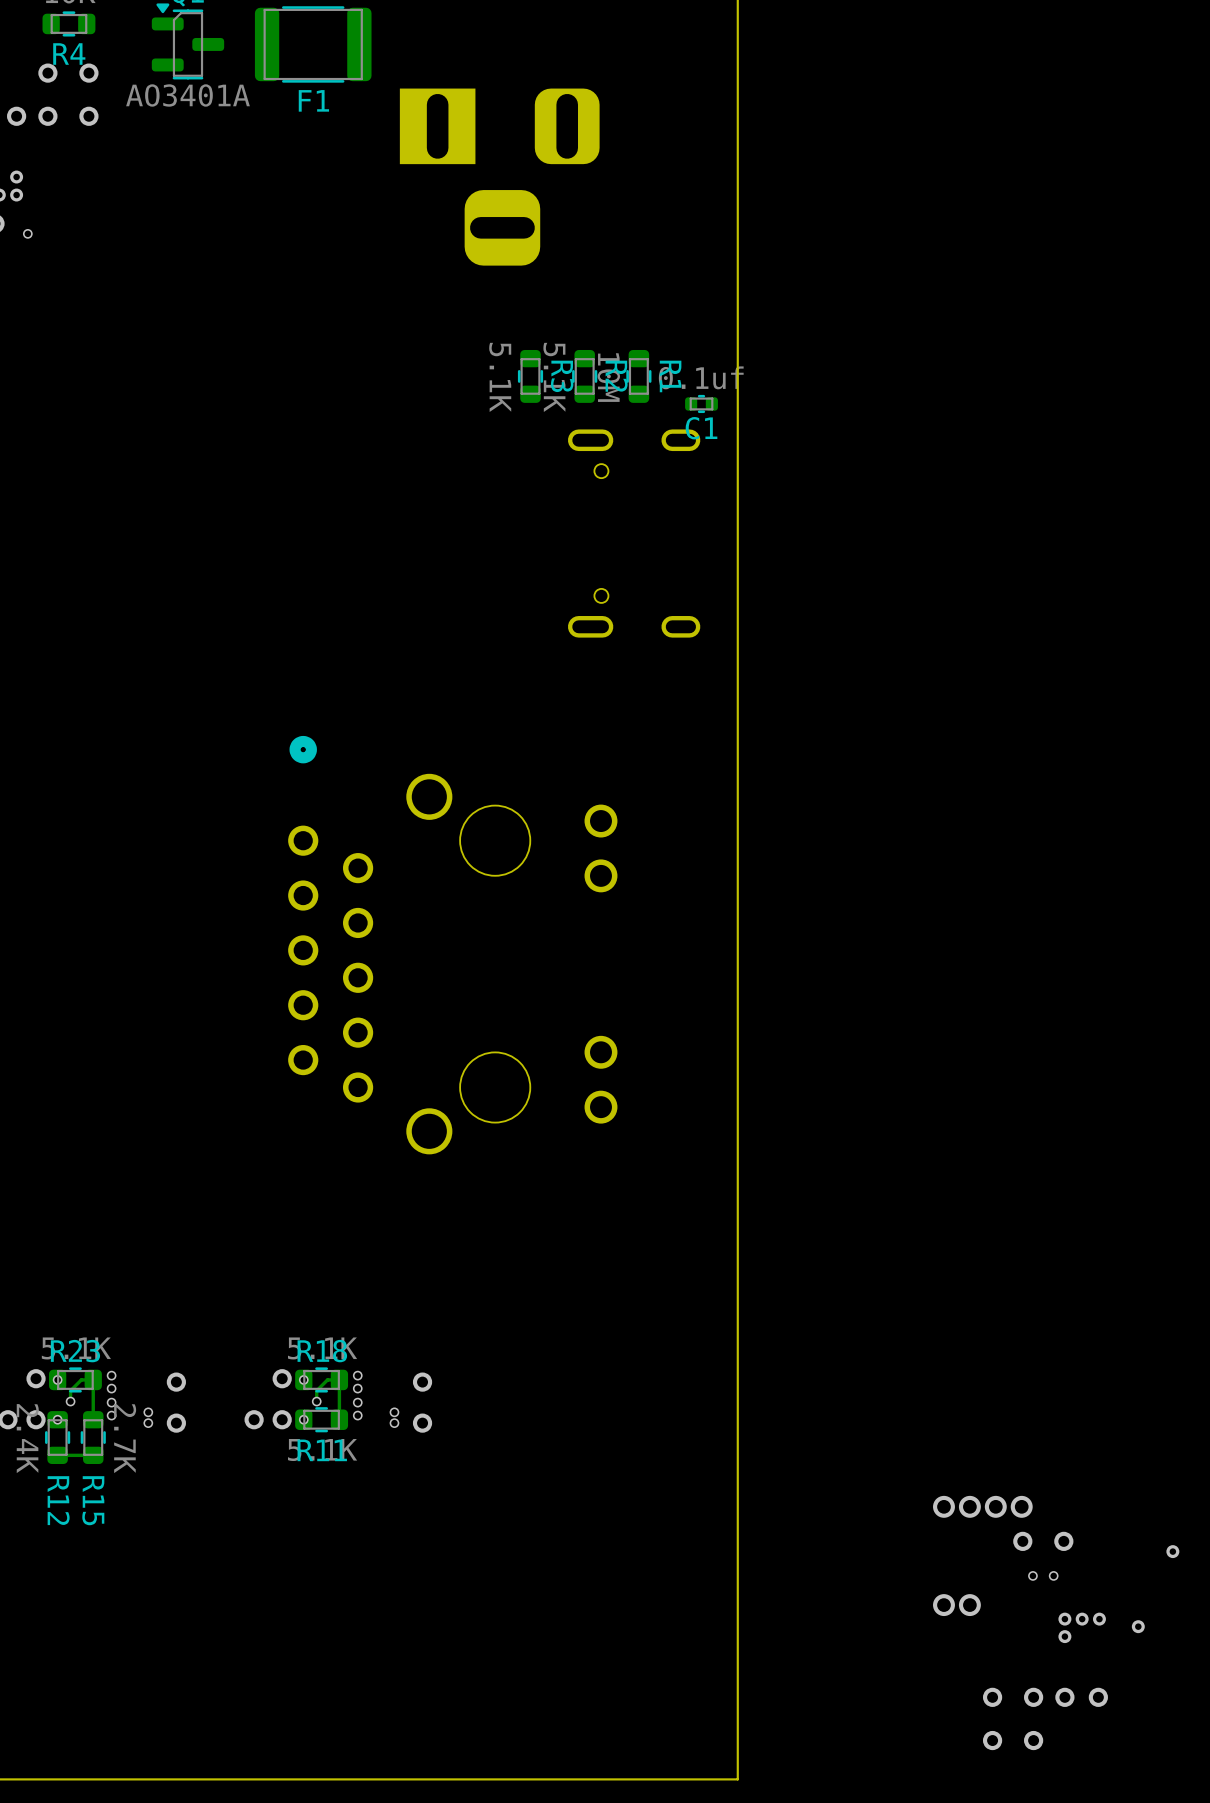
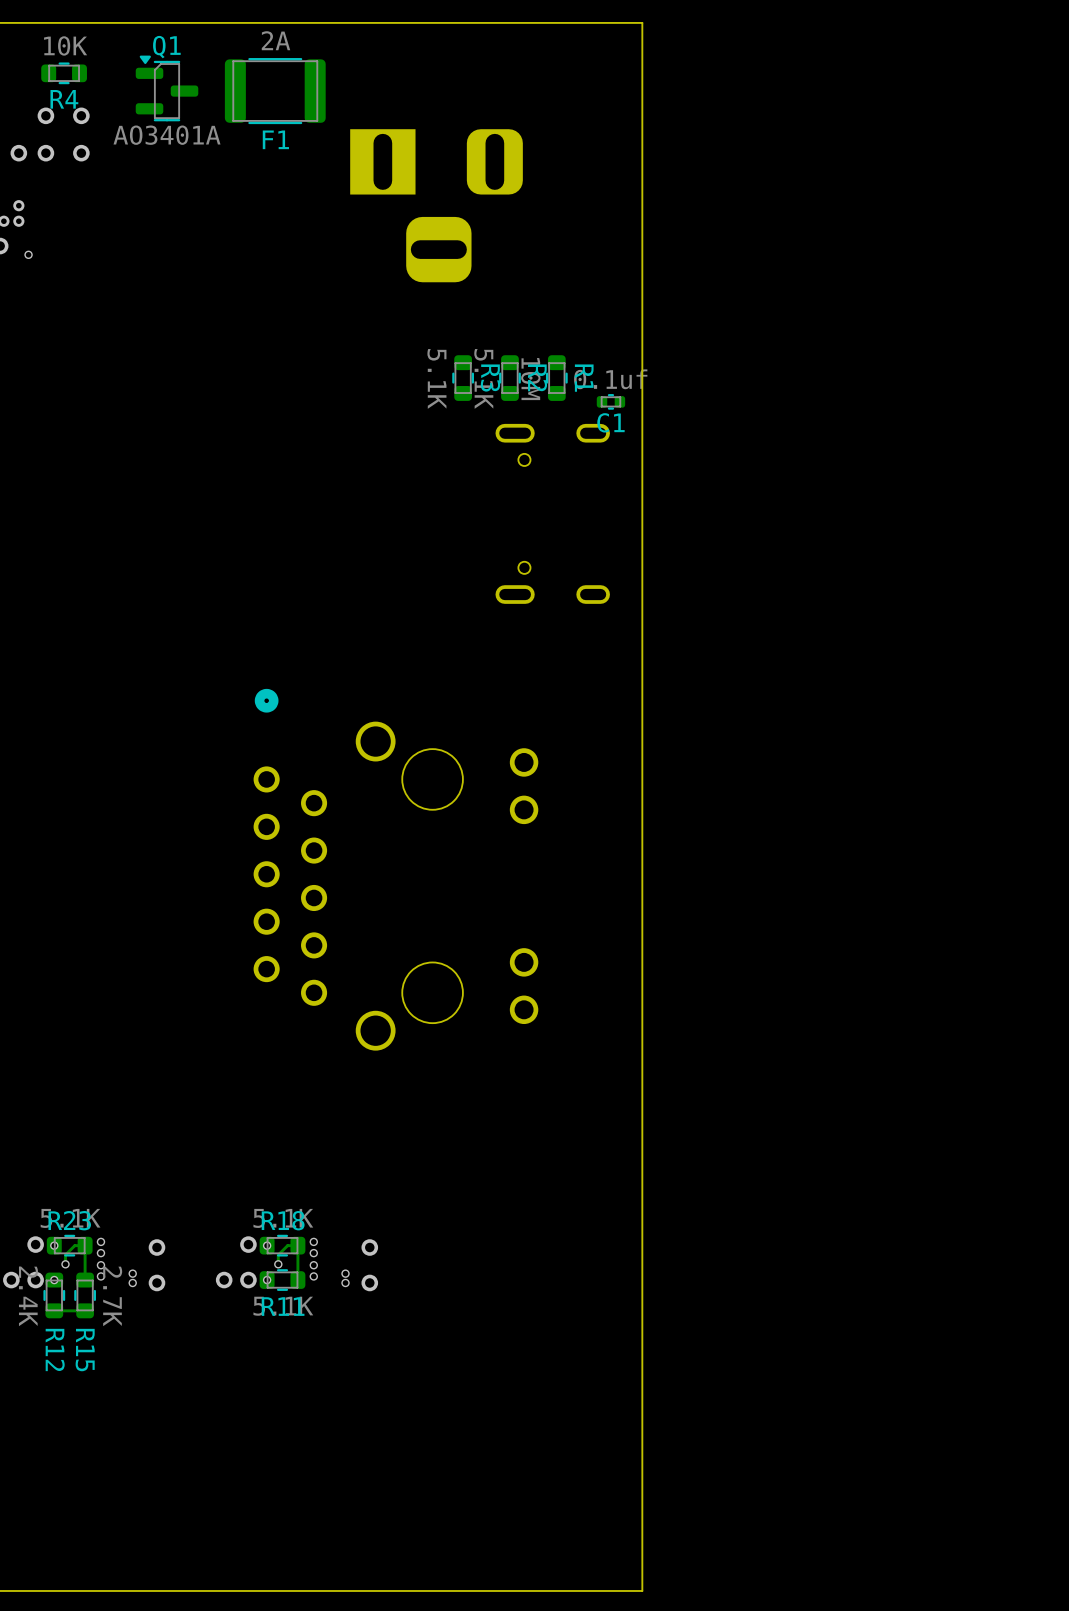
via: (943, 1506) -> none
via: (969, 1506) -> none
via: (995, 1506) -> none
via: (1021, 1506) -> none
via: (1022, 1541) -> none
via: (1063, 1541) -> none
via: (1172, 1551) -> none
via: (1032, 1575) -> none
via: (1053, 1575) -> none
via: (943, 1605) -> none
via: (969, 1605) -> none
via: (1064, 1619) -> none
via: (1082, 1619) -> none
via: (1099, 1619) -> none
via: (1138, 1626) -> none
via: (1064, 1636) -> none
via: (992, 1697) -> none
via: (1033, 1697) -> none
via: (1064, 1697) -> none
via: (1098, 1697) -> none
via: (992, 1740) -> none
via: (1033, 1740) -> none

